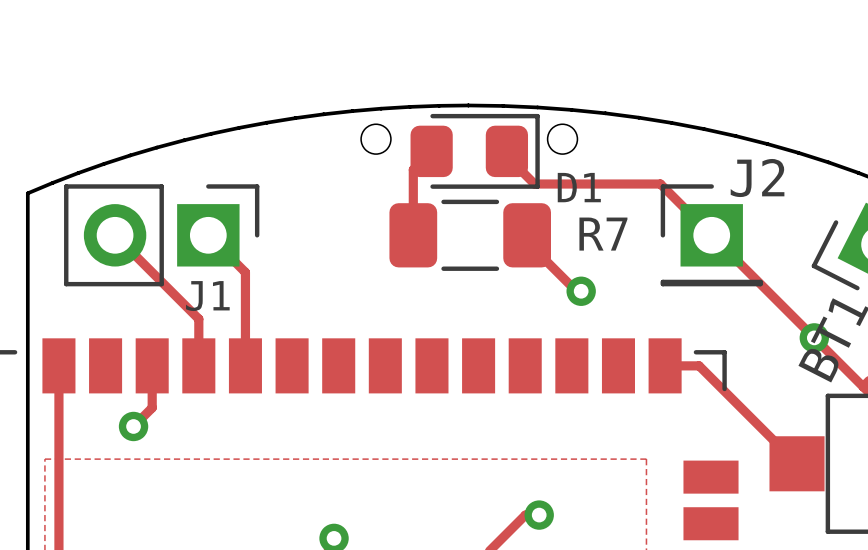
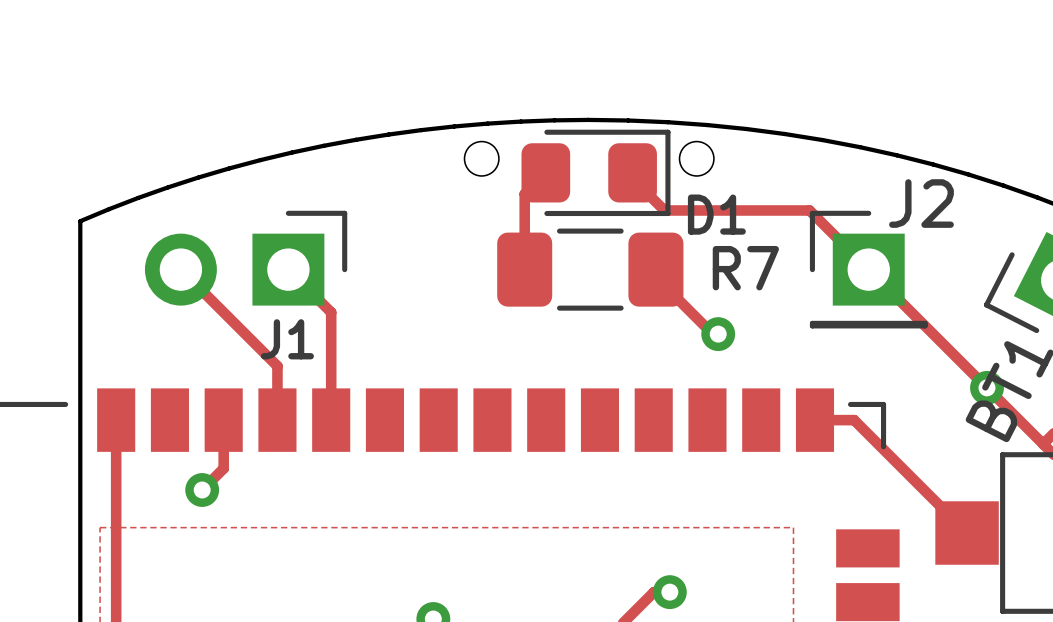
J1 footprint: [64, 184, 260, 287] -> [144, 210, 348, 306]

